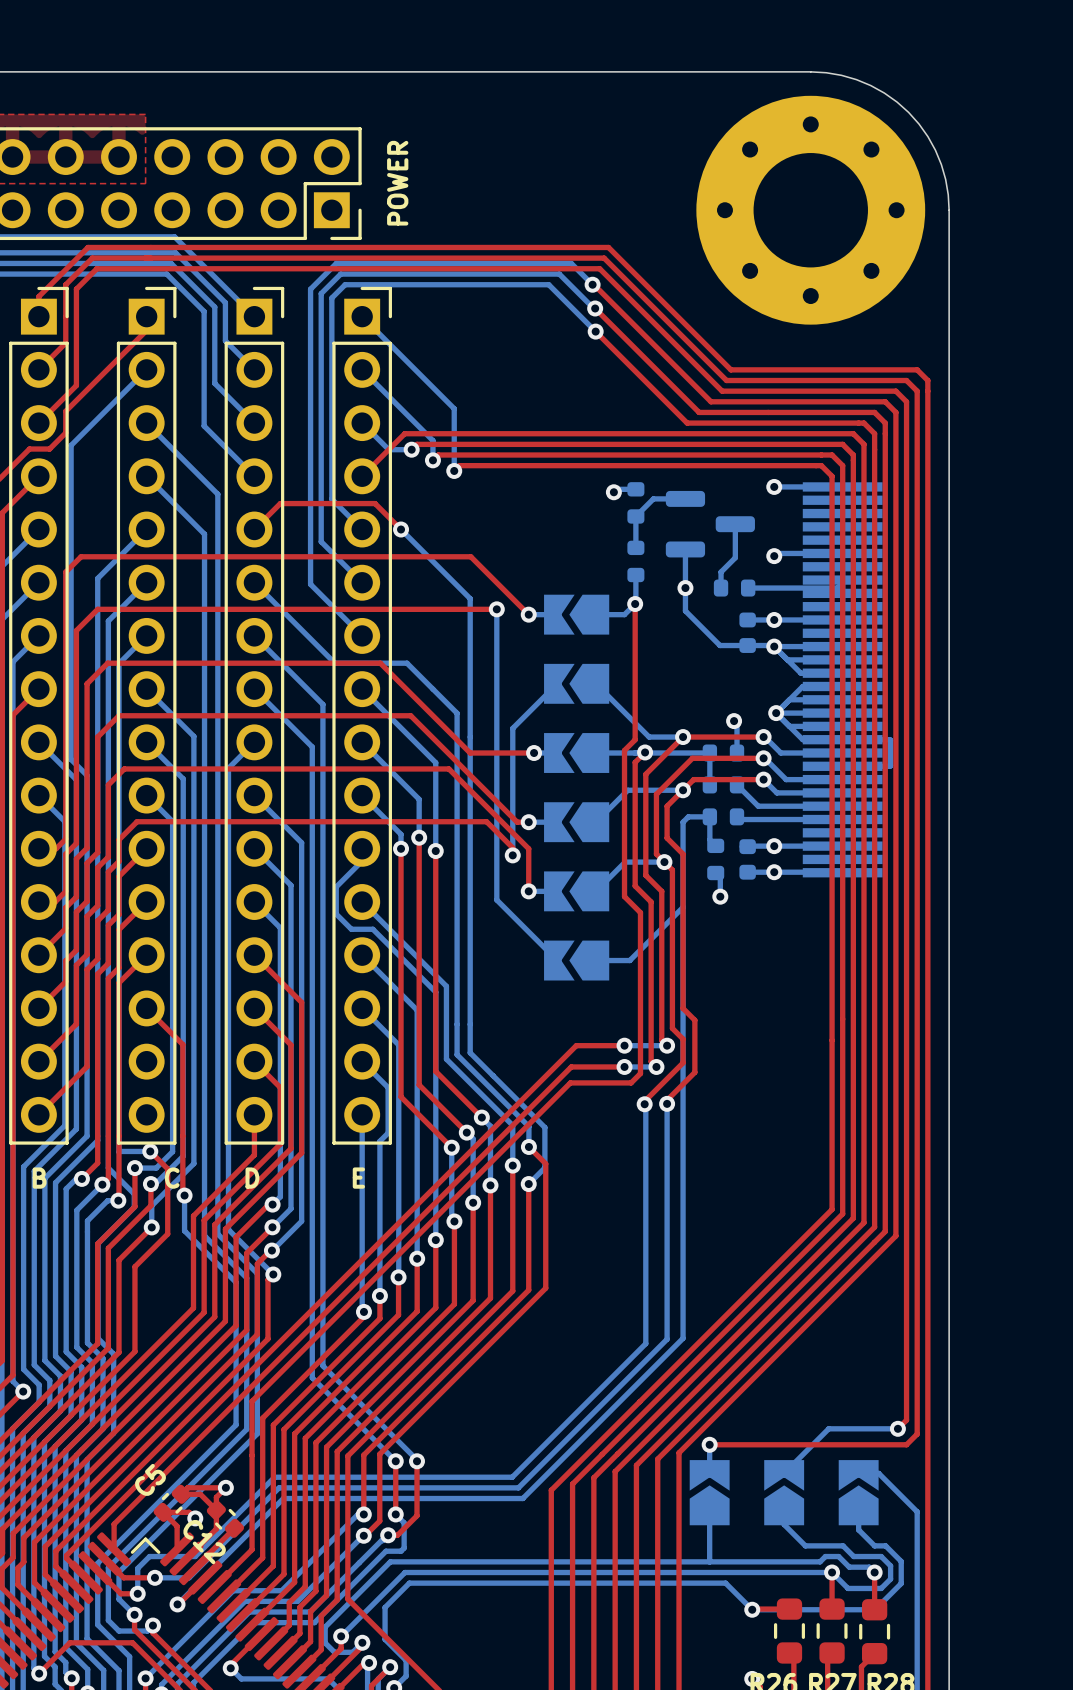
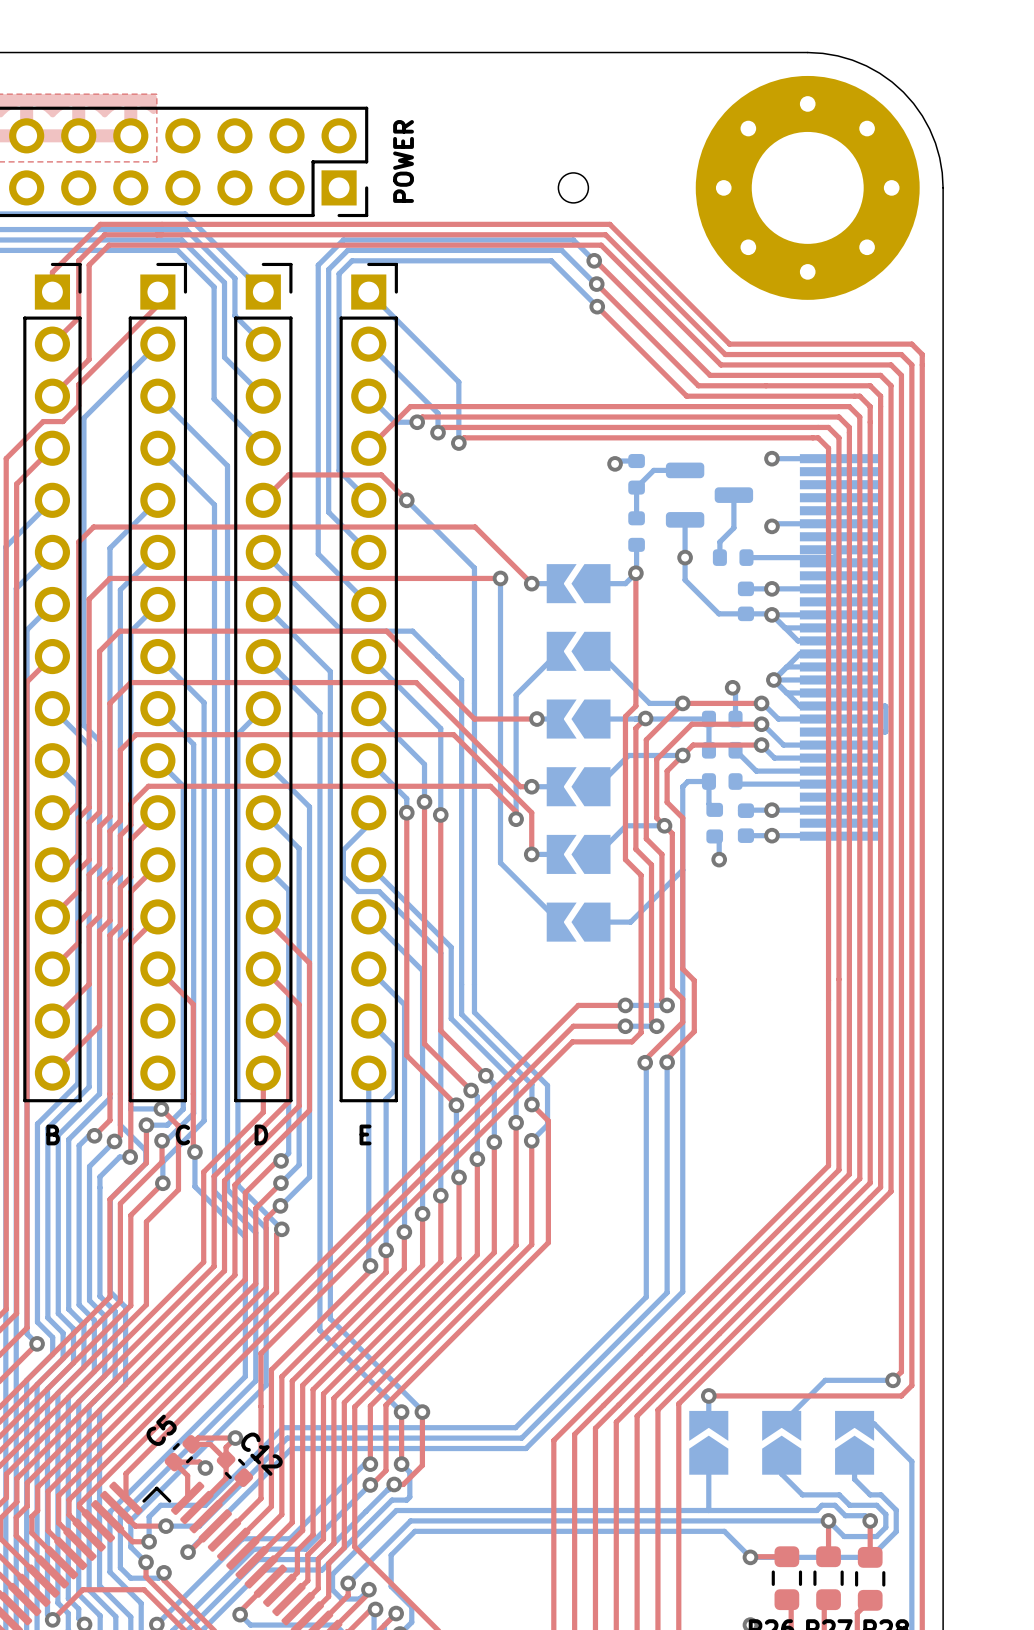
round board edge: none -> [557, 172, 590, 204]
C12 name position: C12 (204, 1542) -> C12 (261, 1454)

